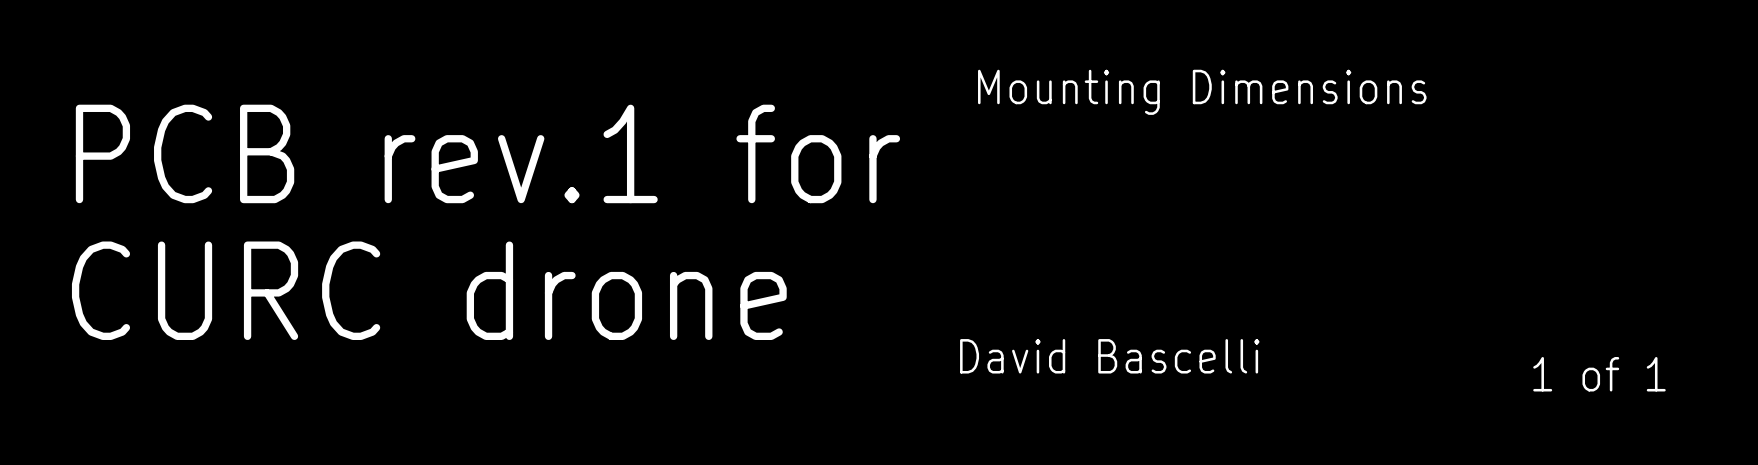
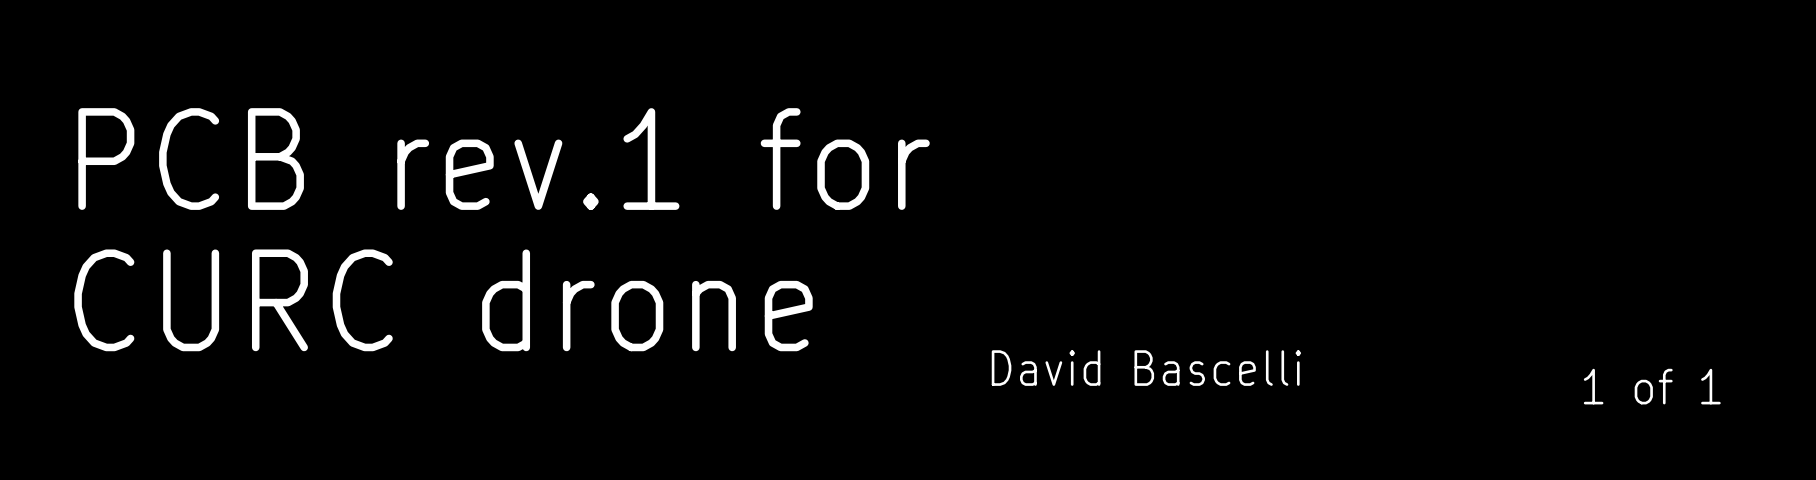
text: Mounting Dimensions (1202, 92) -> none

